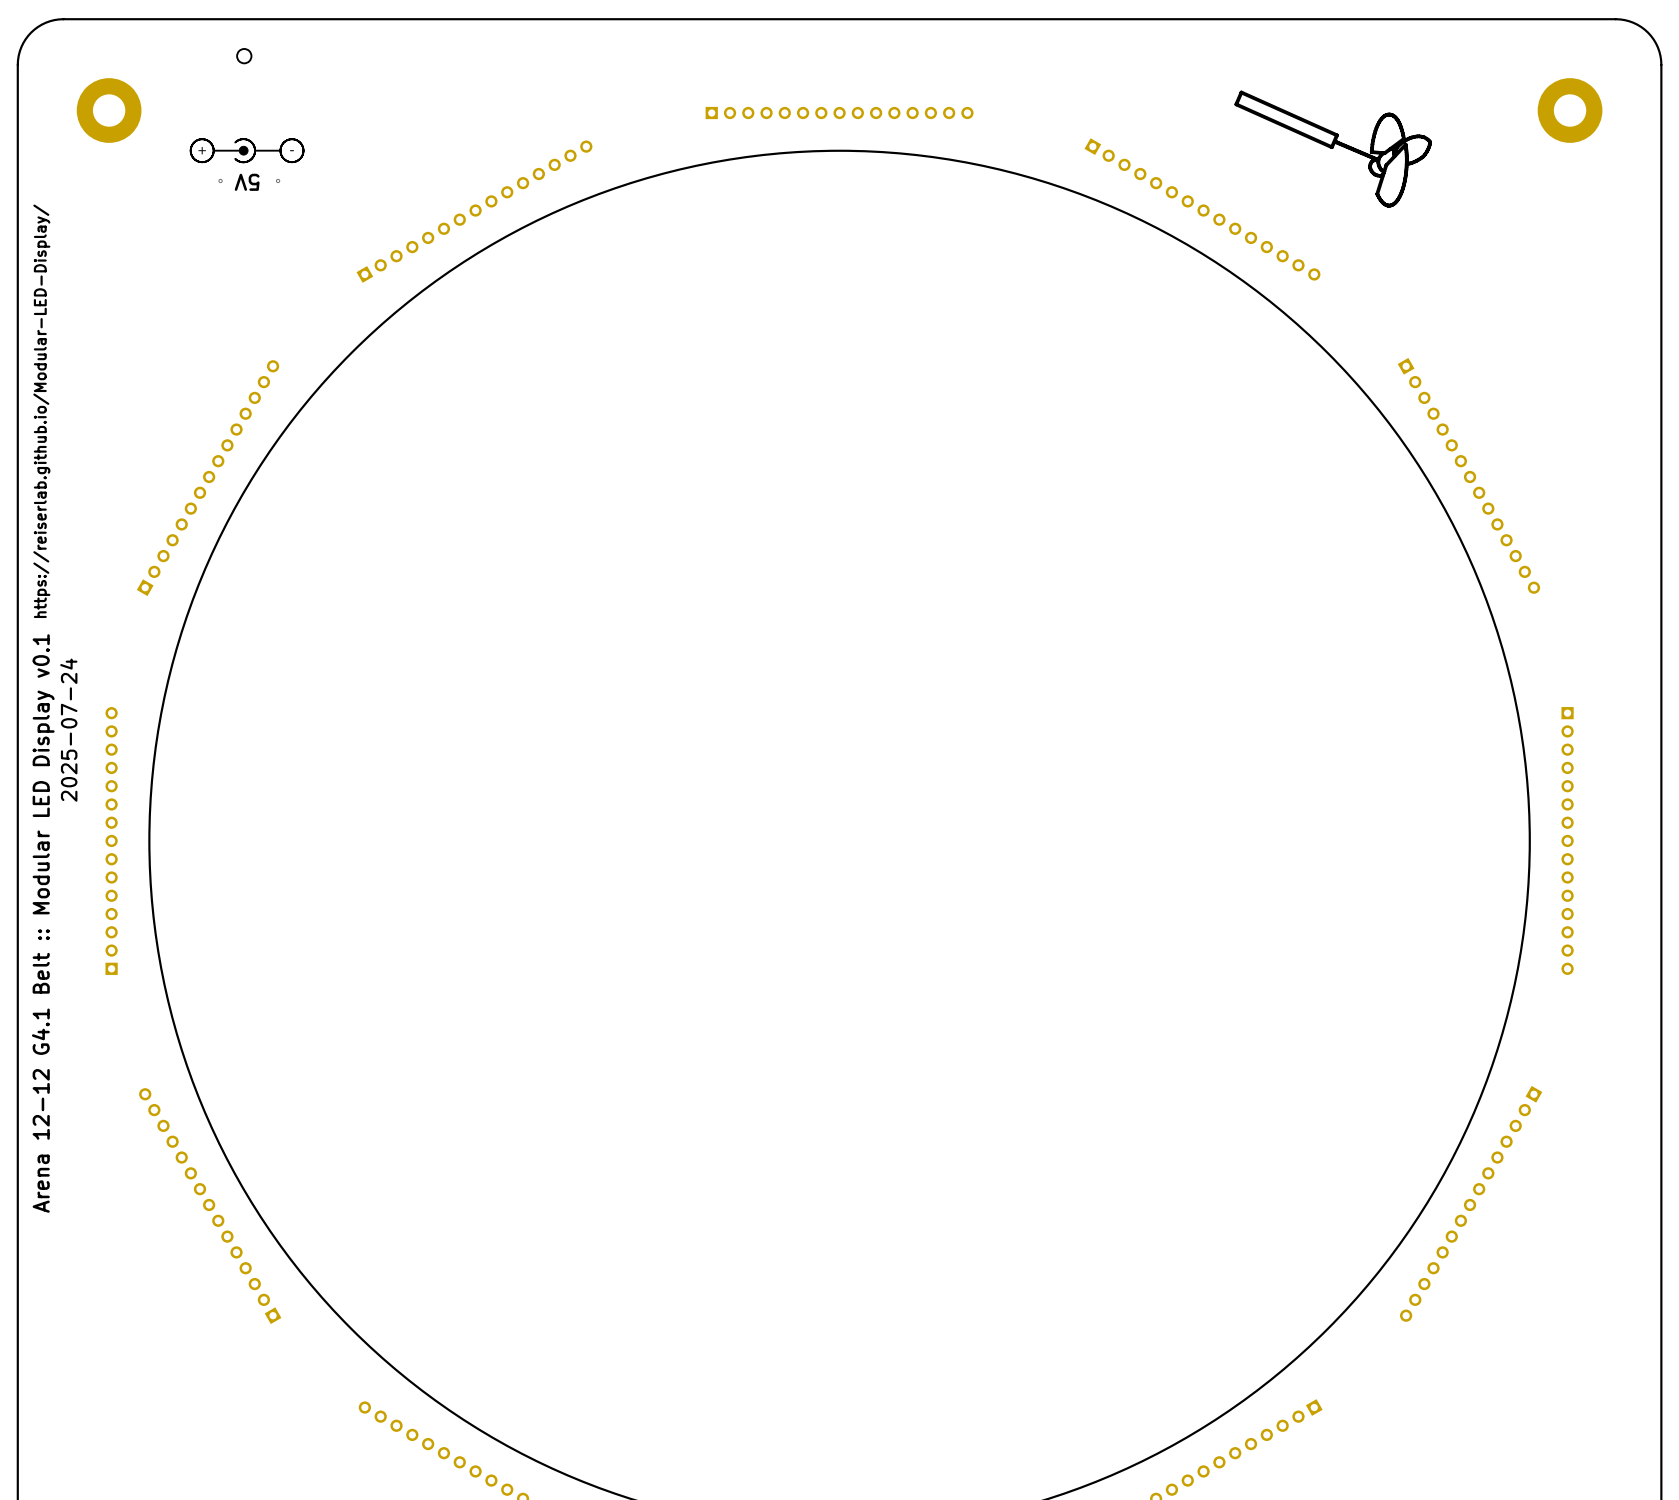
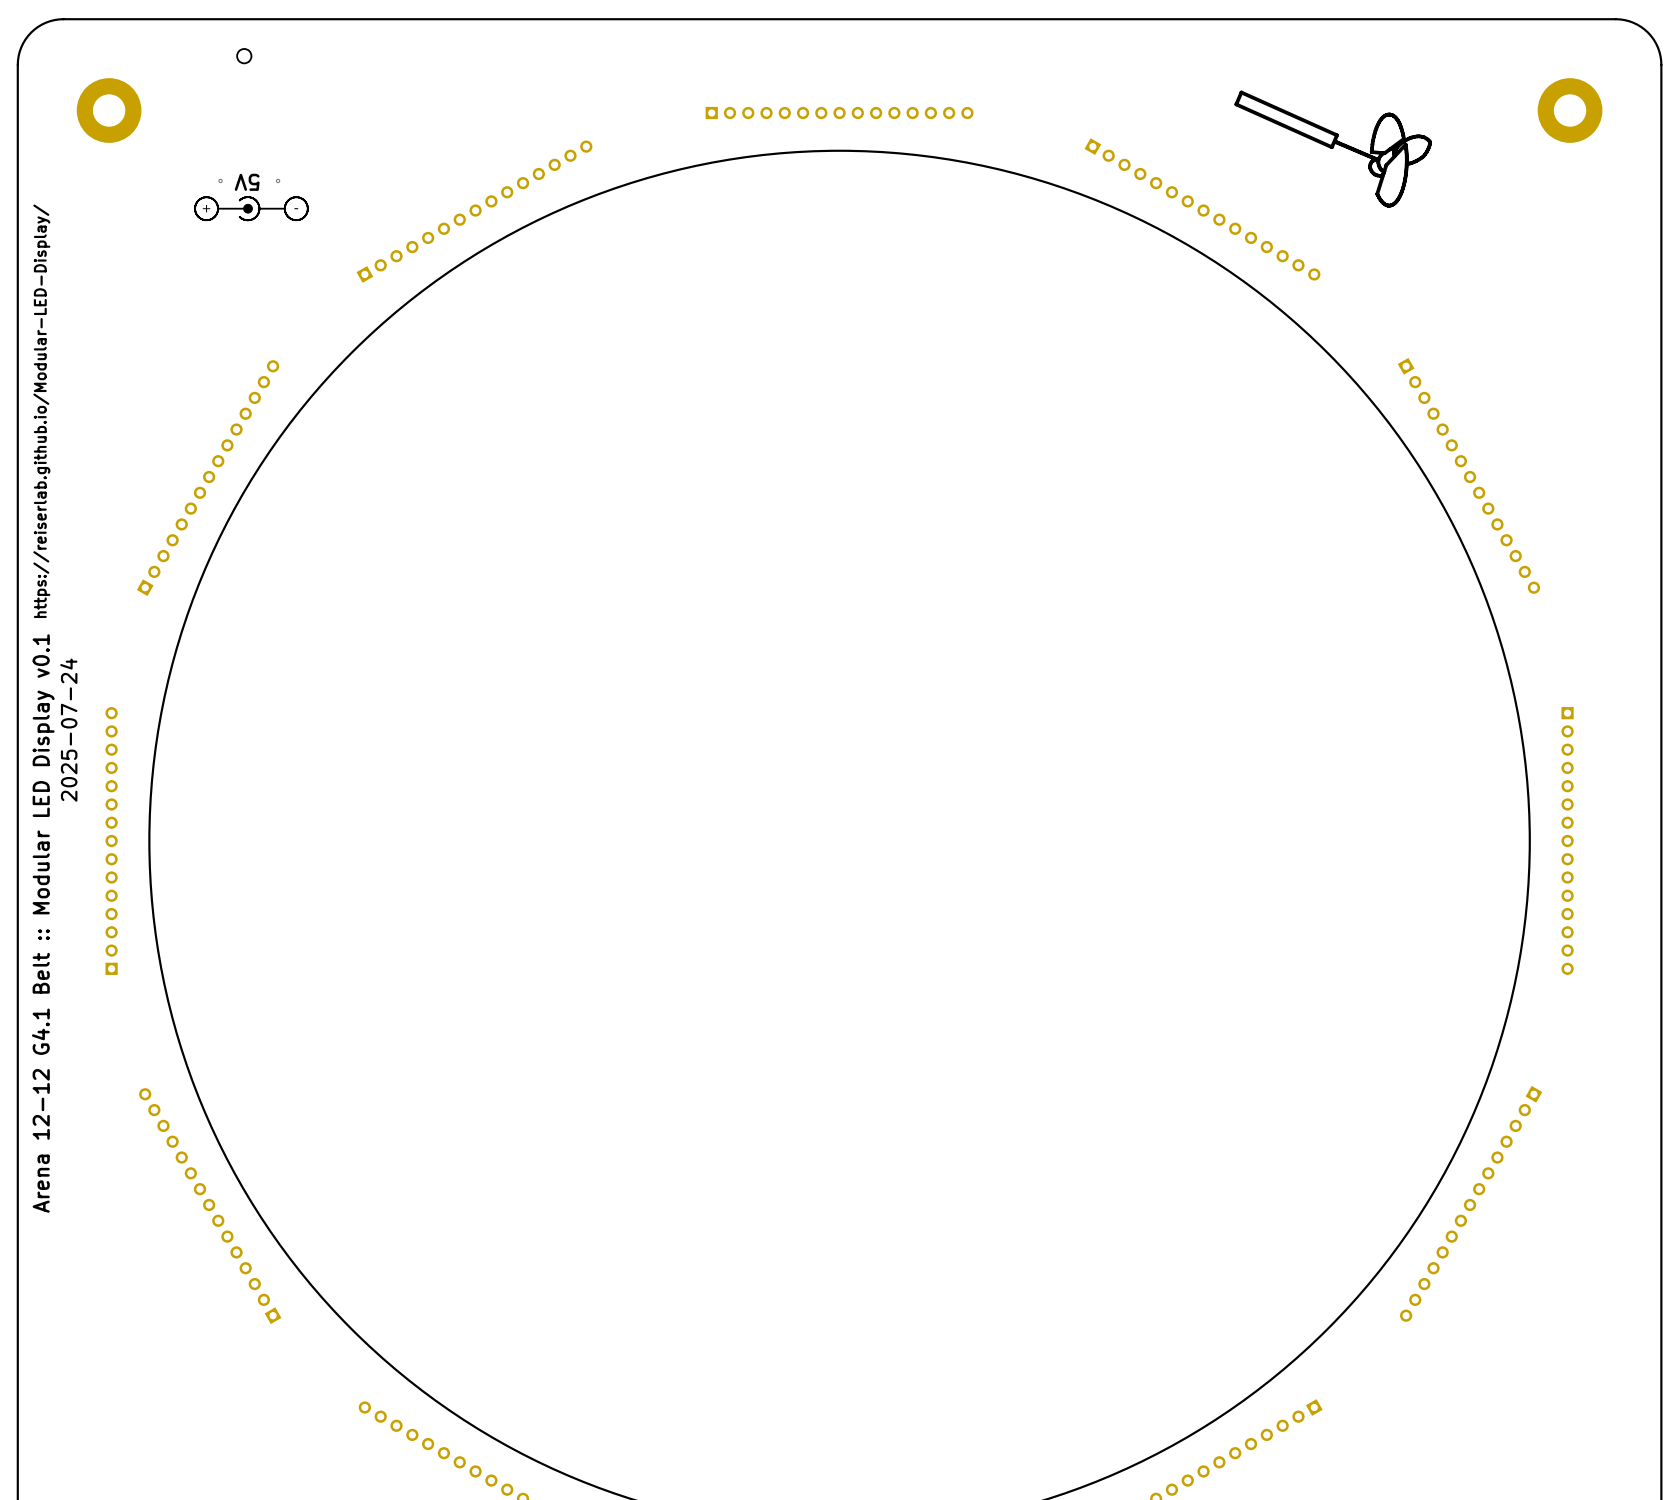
line: (201, 139) (209, 142) (213, 150) (210, 158) (202, 162) (194, 159) (190, 151) (193, 142) (201, 139) -> (205, 197) (214, 200) (218, 208) (215, 216) (207, 220) (198, 217) (195, 209) (198, 200) (205, 197)
line: (291, 139) (283, 142) (280, 151) (284, 159) (292, 162) (300, 158) (303, 150) (299, 142) (291, 139) -> (295, 197) (287, 200) (284, 209) (288, 217) (296, 220) (304, 216) (307, 208) (304, 200) (295, 197)
line: (235, 142) (241, 139) (247, 139) (253, 144) (255, 150) (253, 157) (247, 161) (241, 162) (235, 158) -> (239, 200) (245, 197) (252, 197) (257, 202) (259, 208) (257, 215) (252, 219) (245, 220) (239, 216)
drawing position: (202, 150) -> (206, 208)
line: (214, 150) (238, 150) -> (218, 208) (243, 208)
drawing position: (243, 150) -> (248, 208)
line: (255, 150) (280, 150) -> (259, 208) (284, 208)
drawing position: (291, 150) -> (296, 208)

